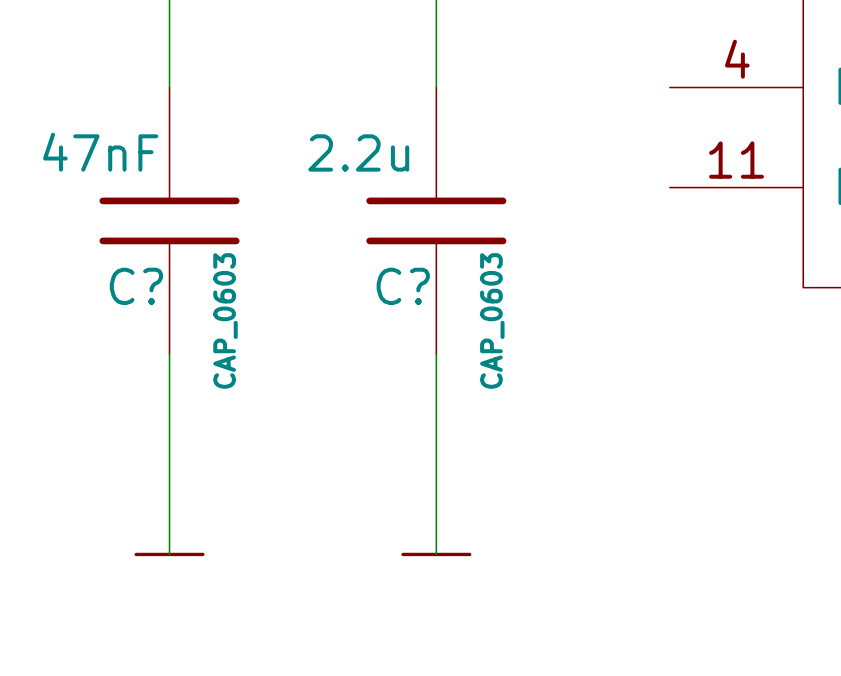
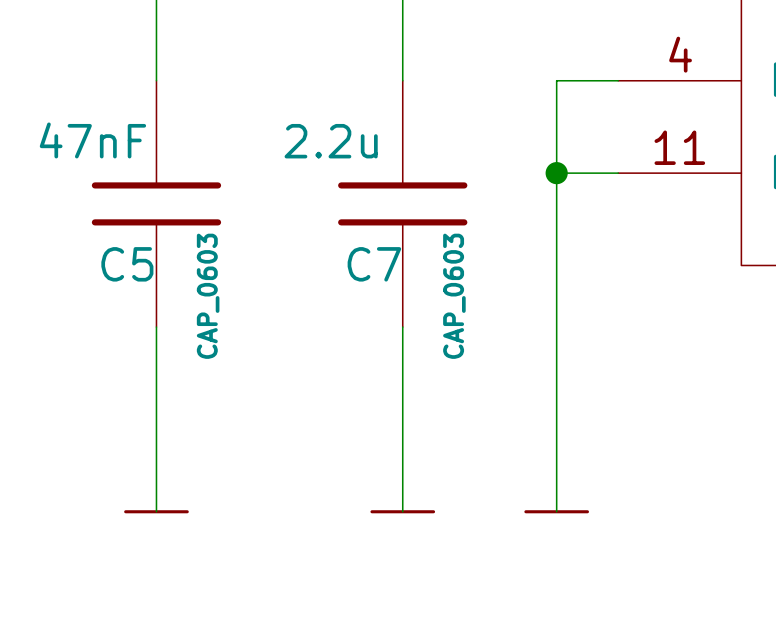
wire: none -> (618, 80) (556, 80) (556, 511)
wire: none -> (556, 173) (618, 173)
junction: none -> (556, 173)
C? name: C? (136, 286) -> C5 (127, 264)
C? name: C? (403, 286) -> C7 (374, 264)
power symbol: none -> (556, 511)

